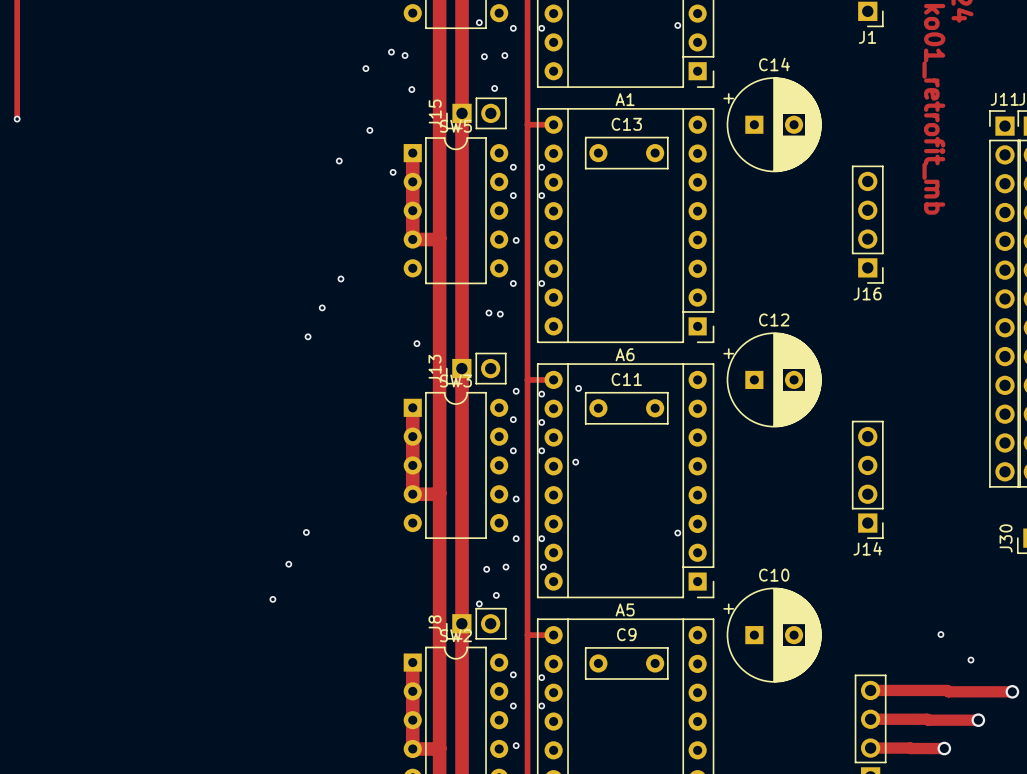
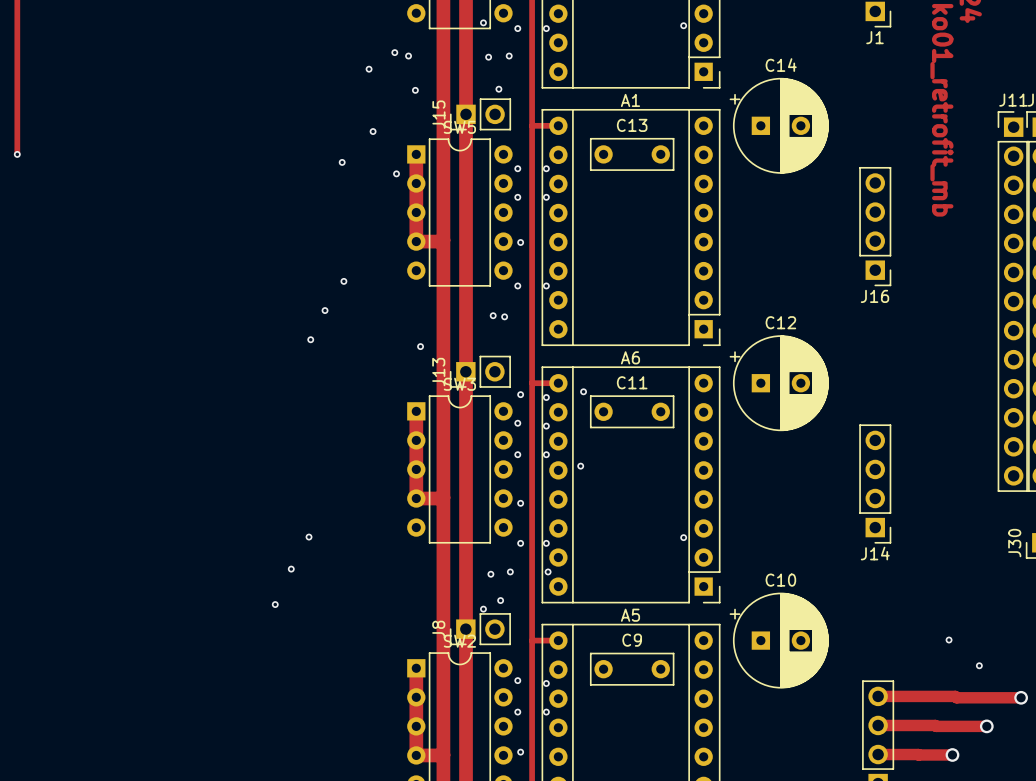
track: none -> (17, 120) (17, 154)
via: (17, 119) -> none
via: none -> (17, 154)

